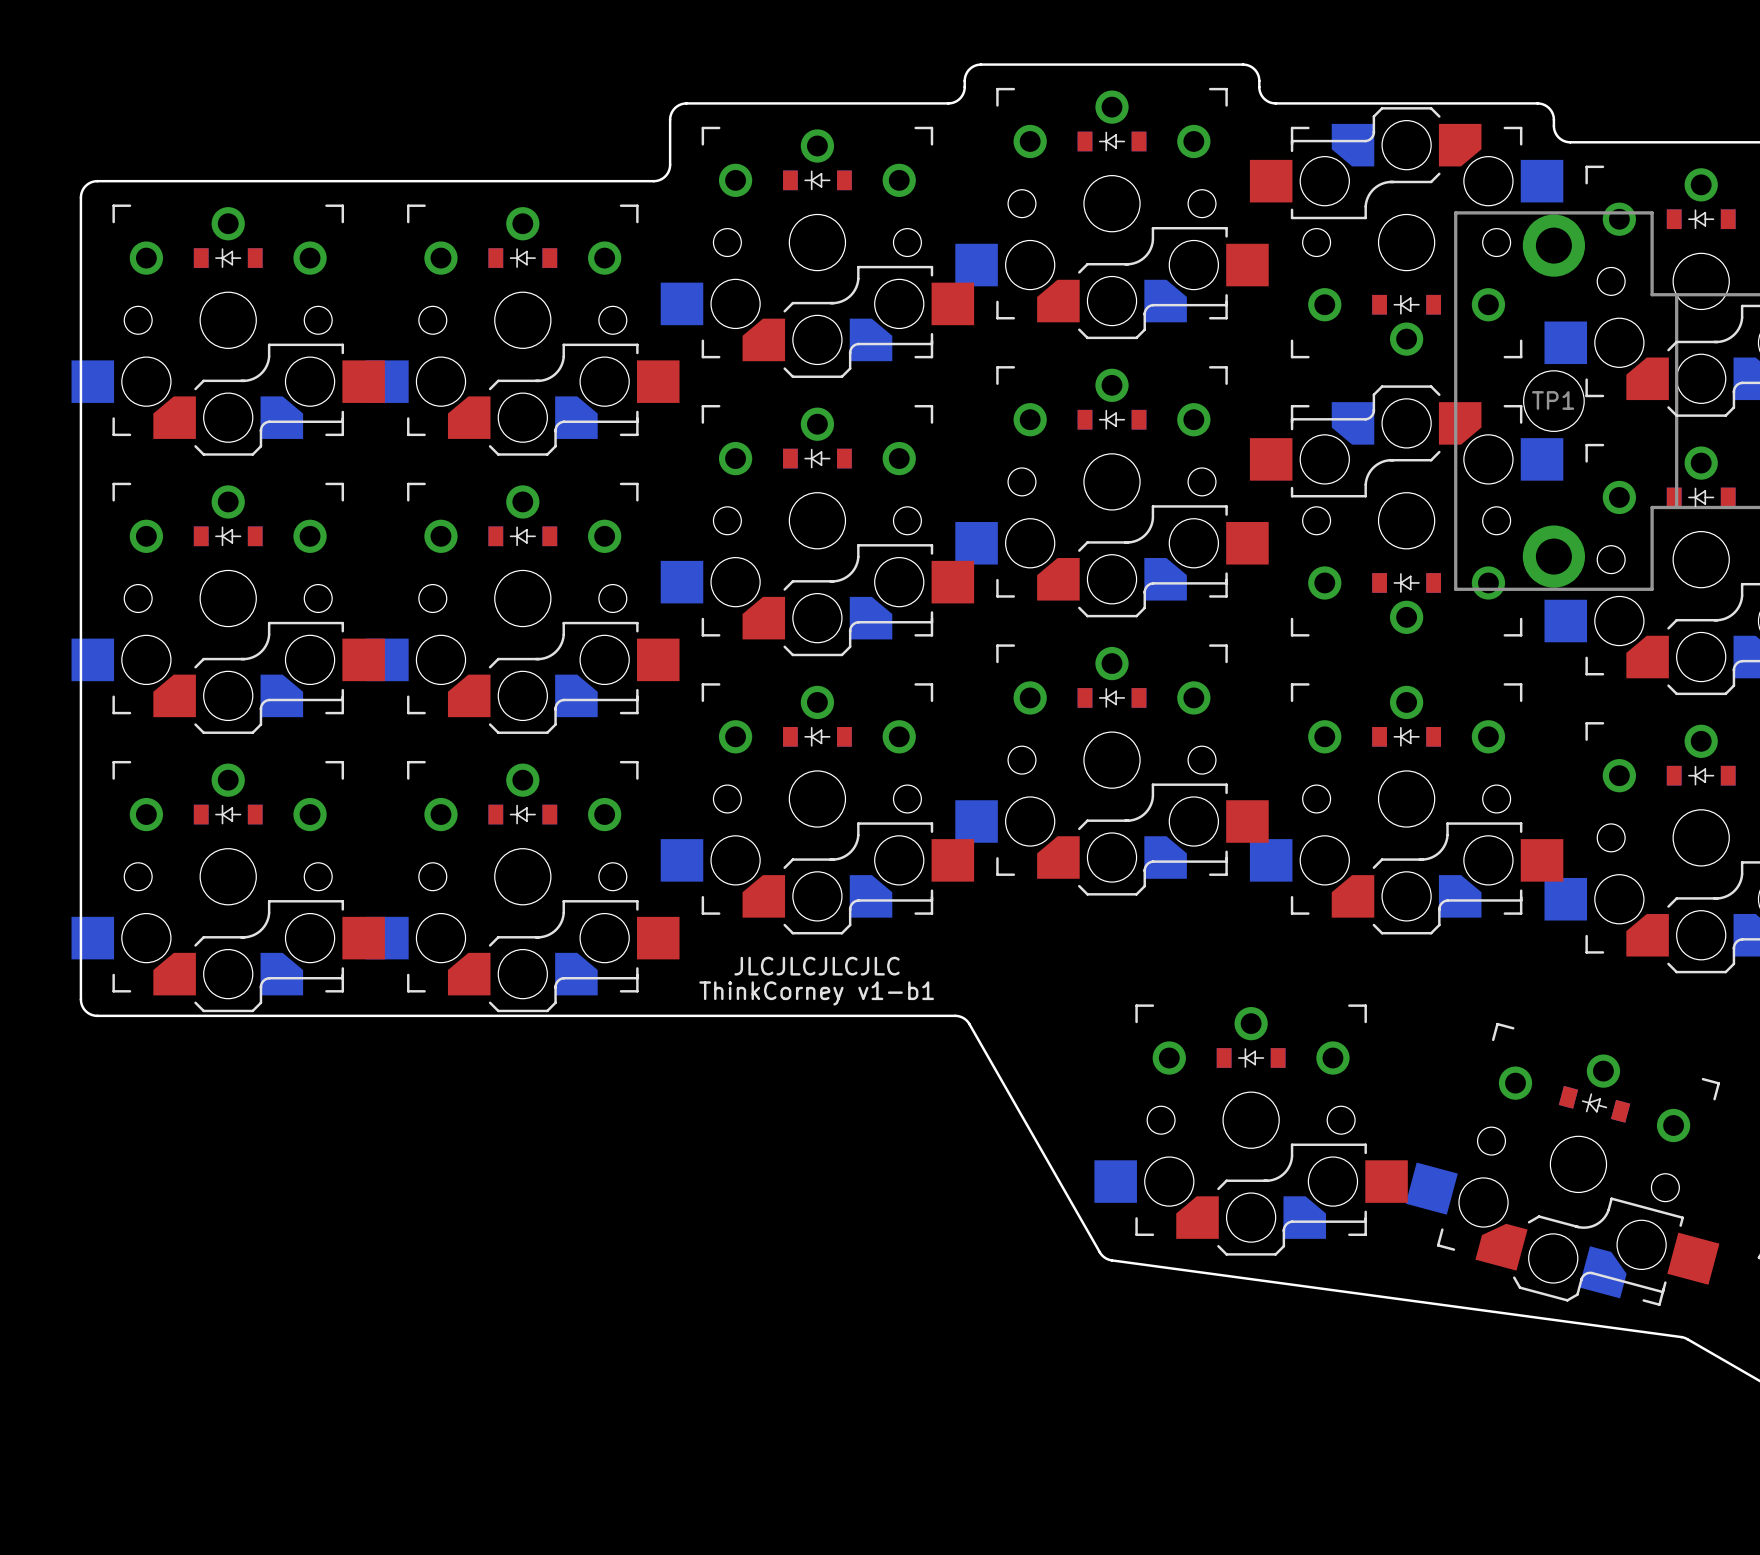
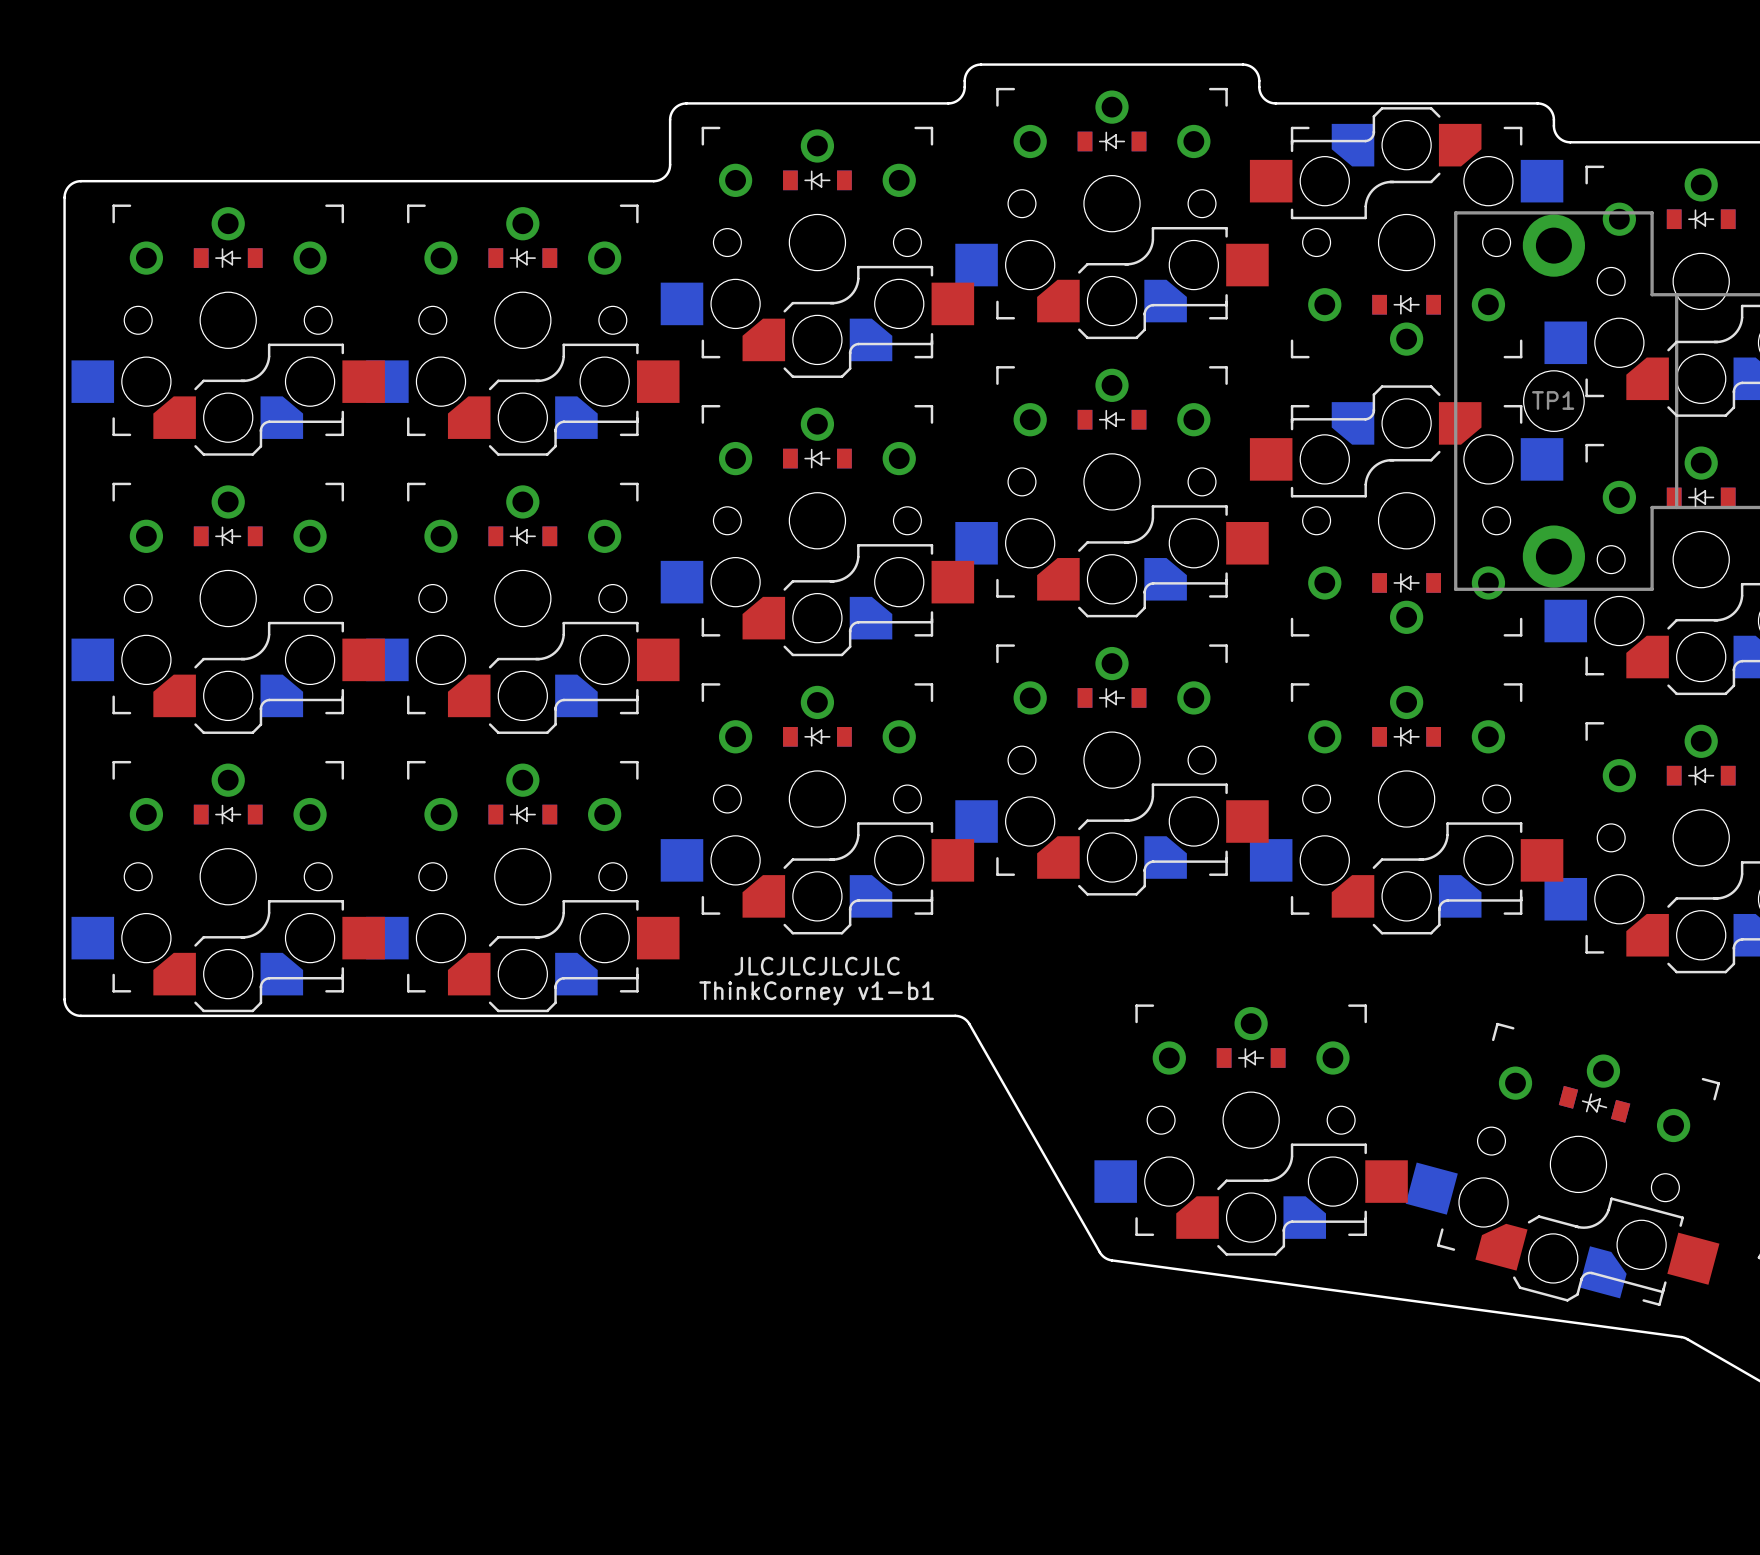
board edge: (97, 181) (85, 185) (80, 197) (80, 999) (85, 1011) (97, 1015) -> (97, 181) (73, 182) (67, 188) (64, 197) (64, 999) (67, 1008) (73, 1014) (97, 1015)

